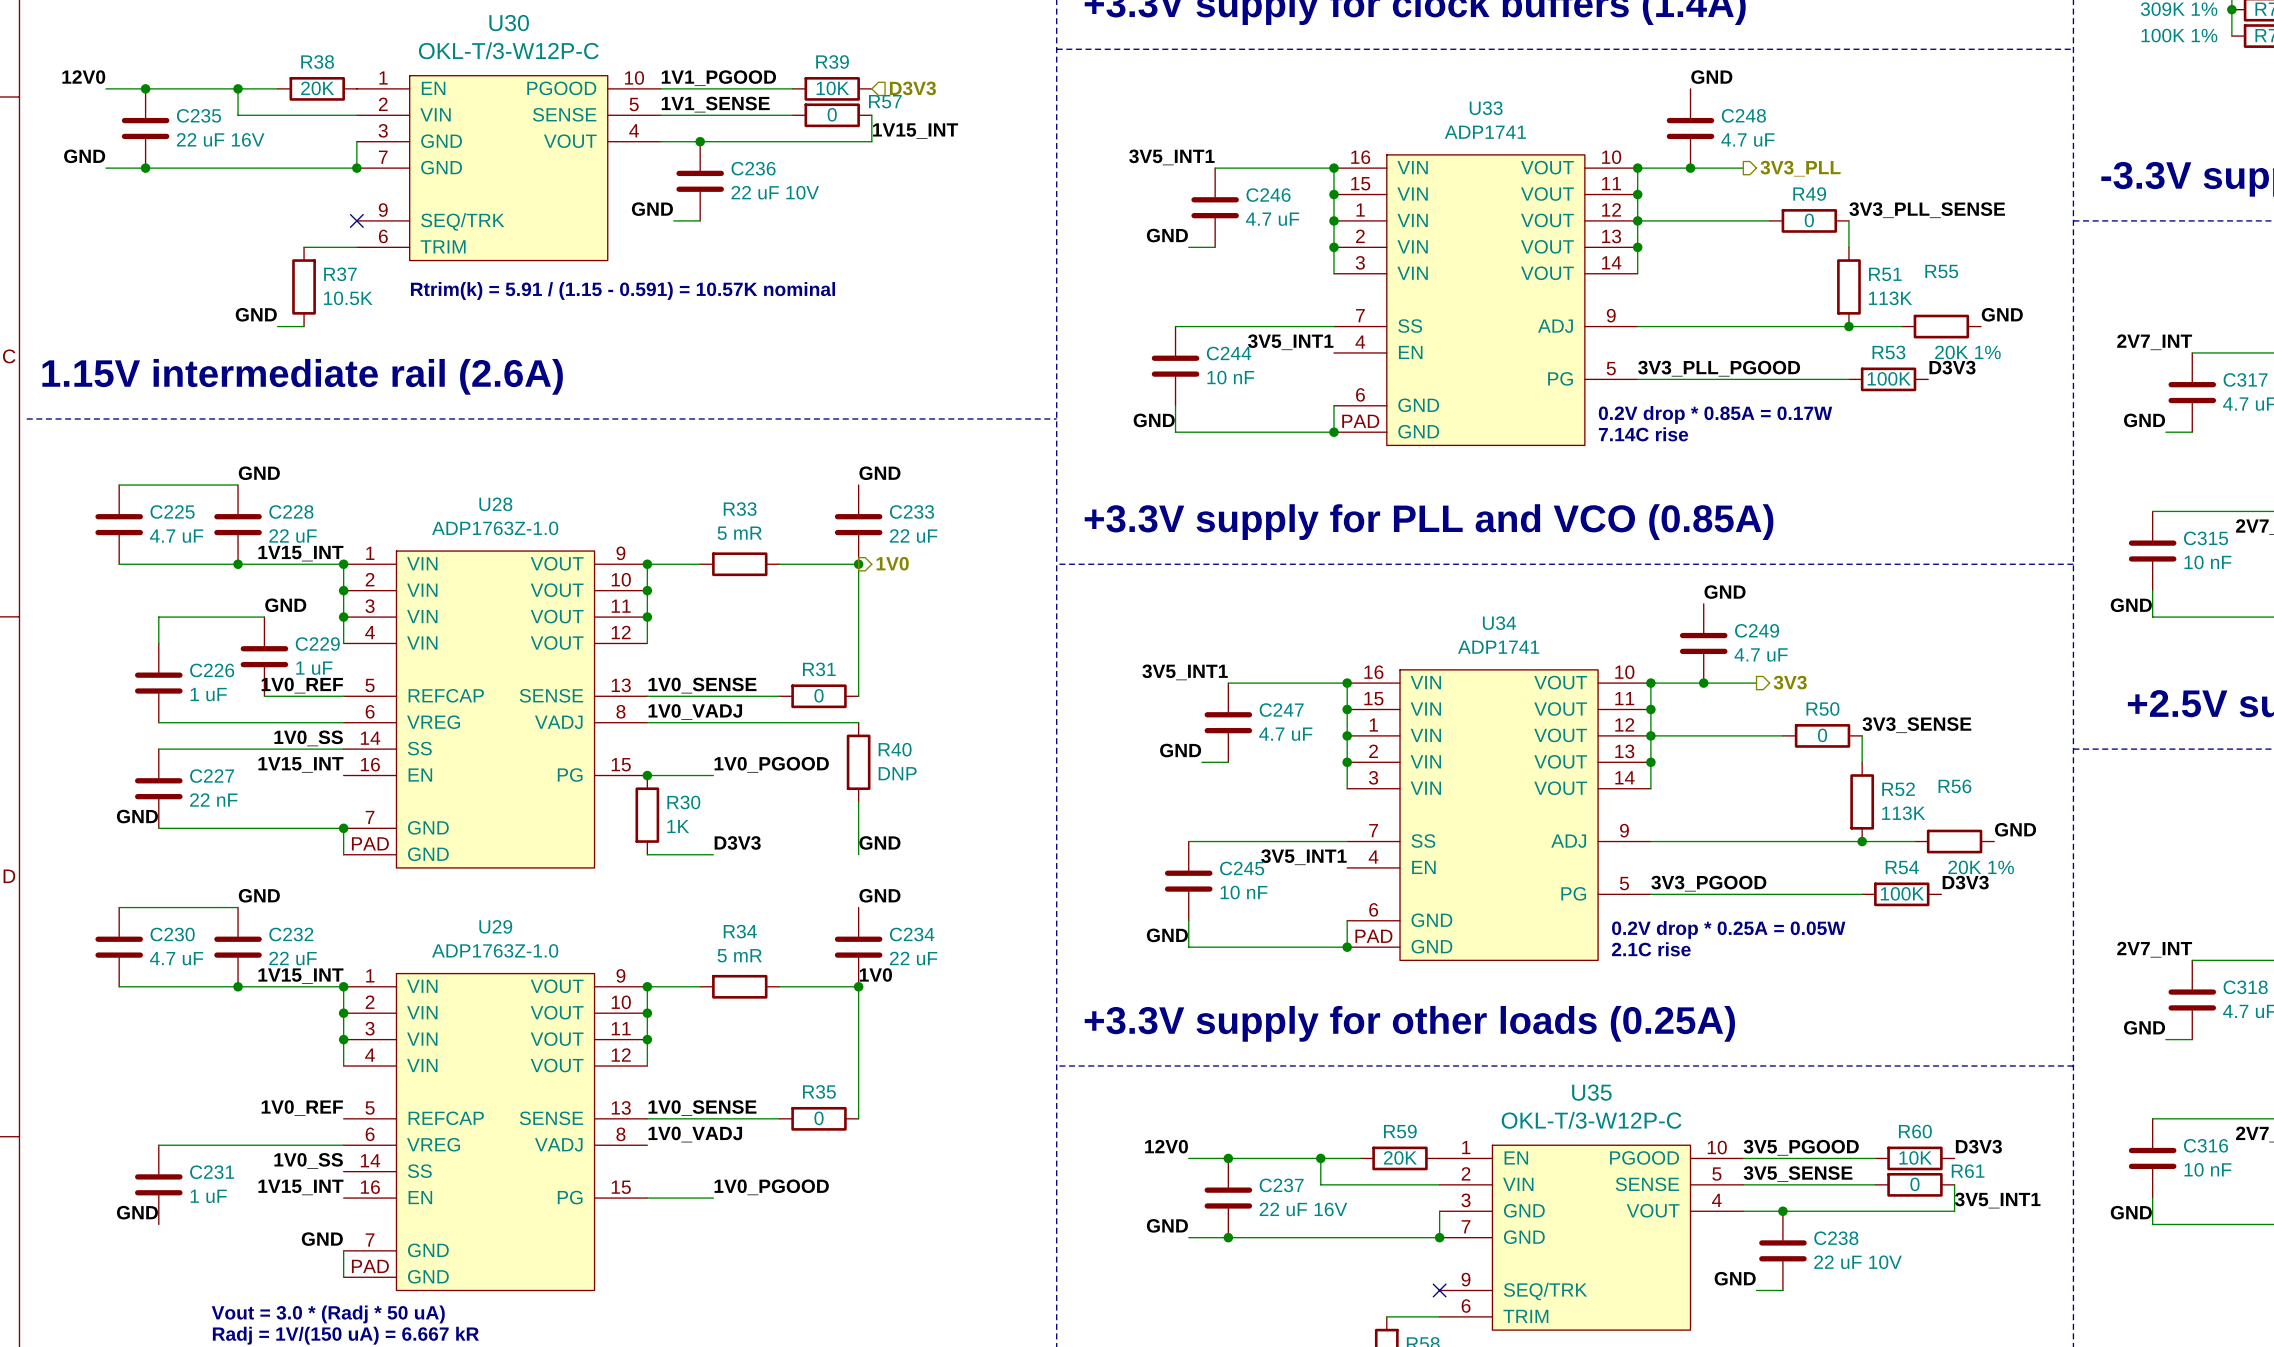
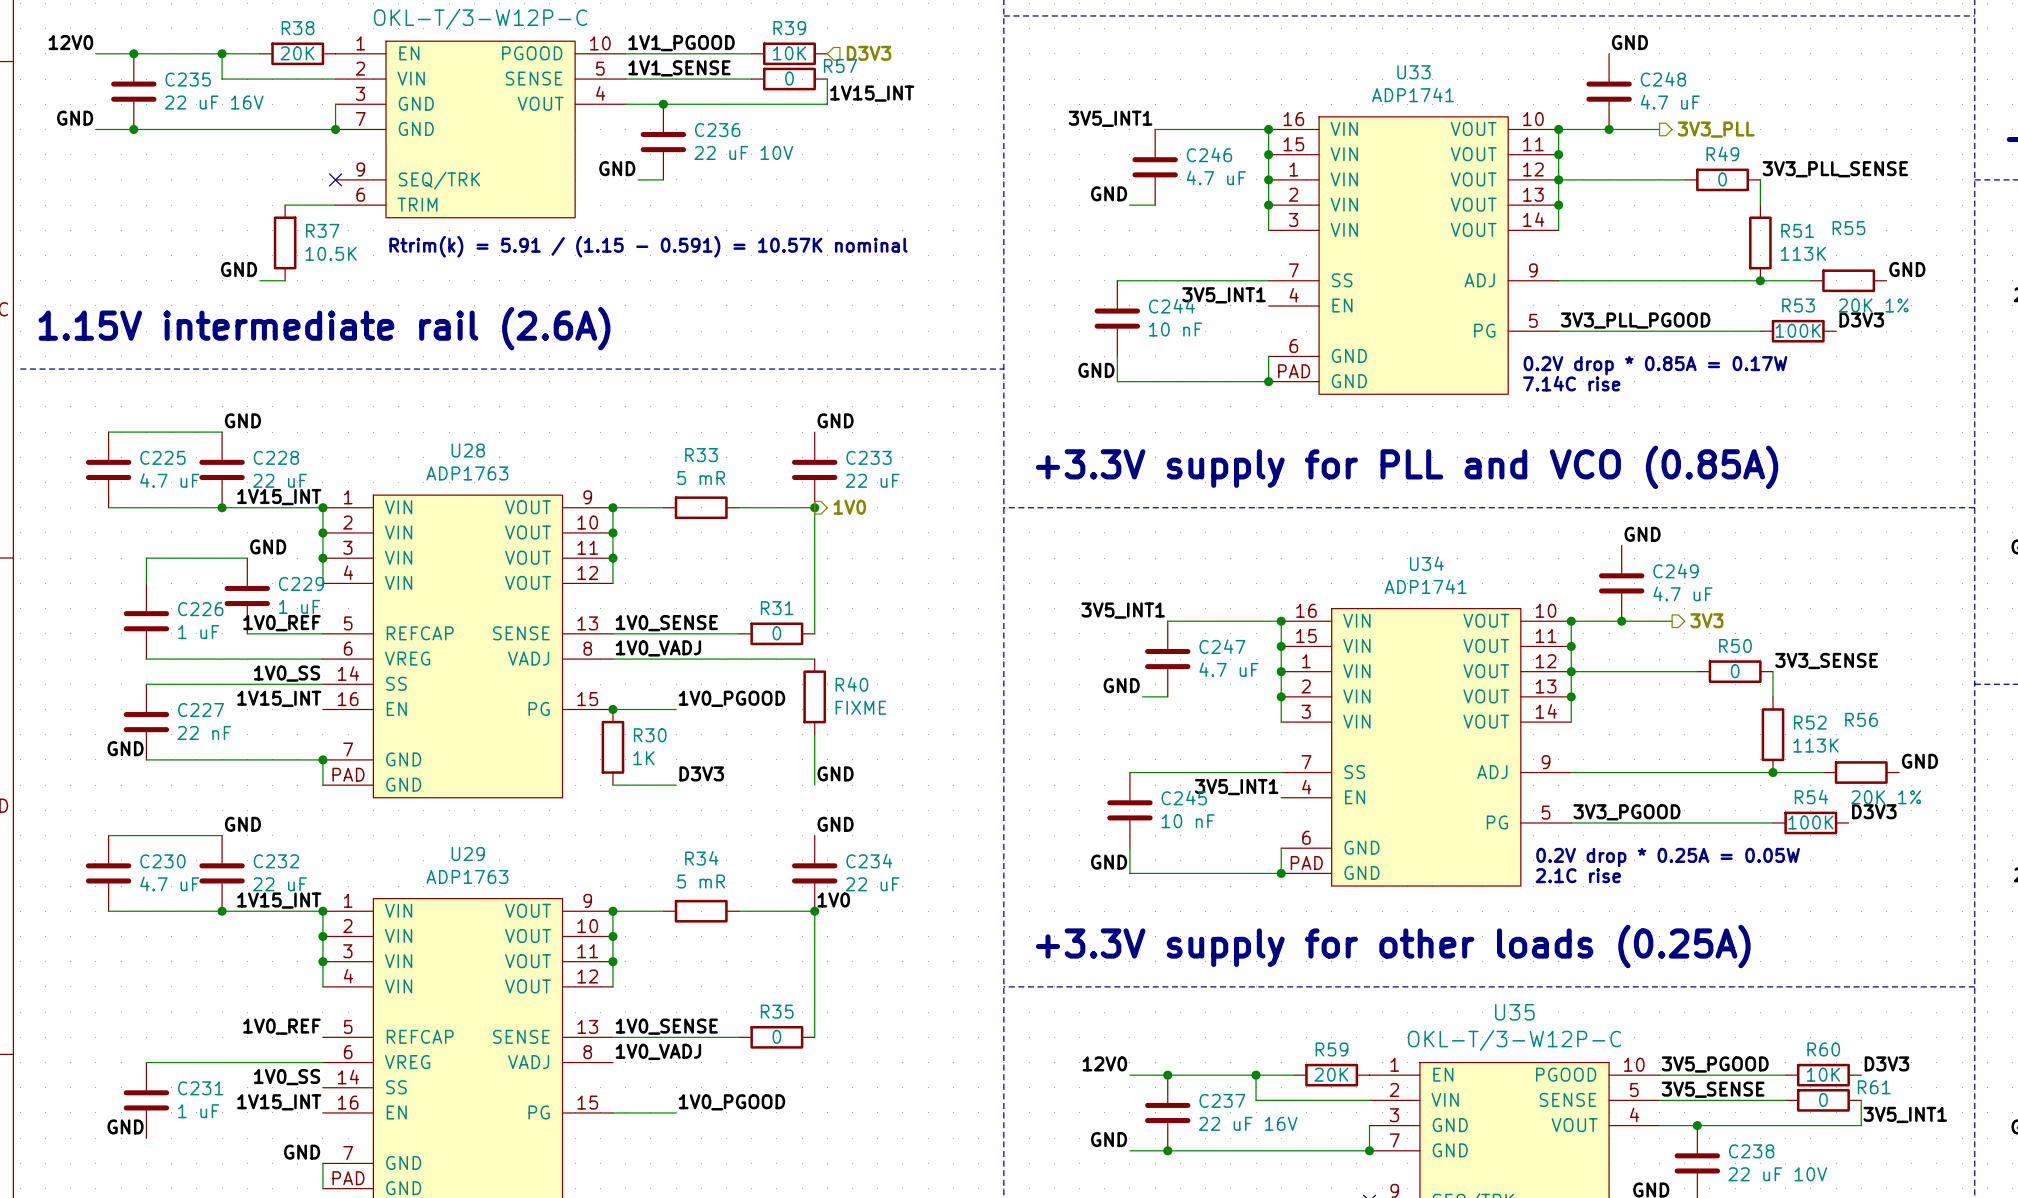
U28 value: ADP1763Z-1.0 (495, 528) -> ADP1763 (467, 473)
R40 value: DNP (897, 773) -> FIXME (860, 707)
U29 value: ADP1763Z-1.0 (495, 950) -> ADP1763 (467, 876)

